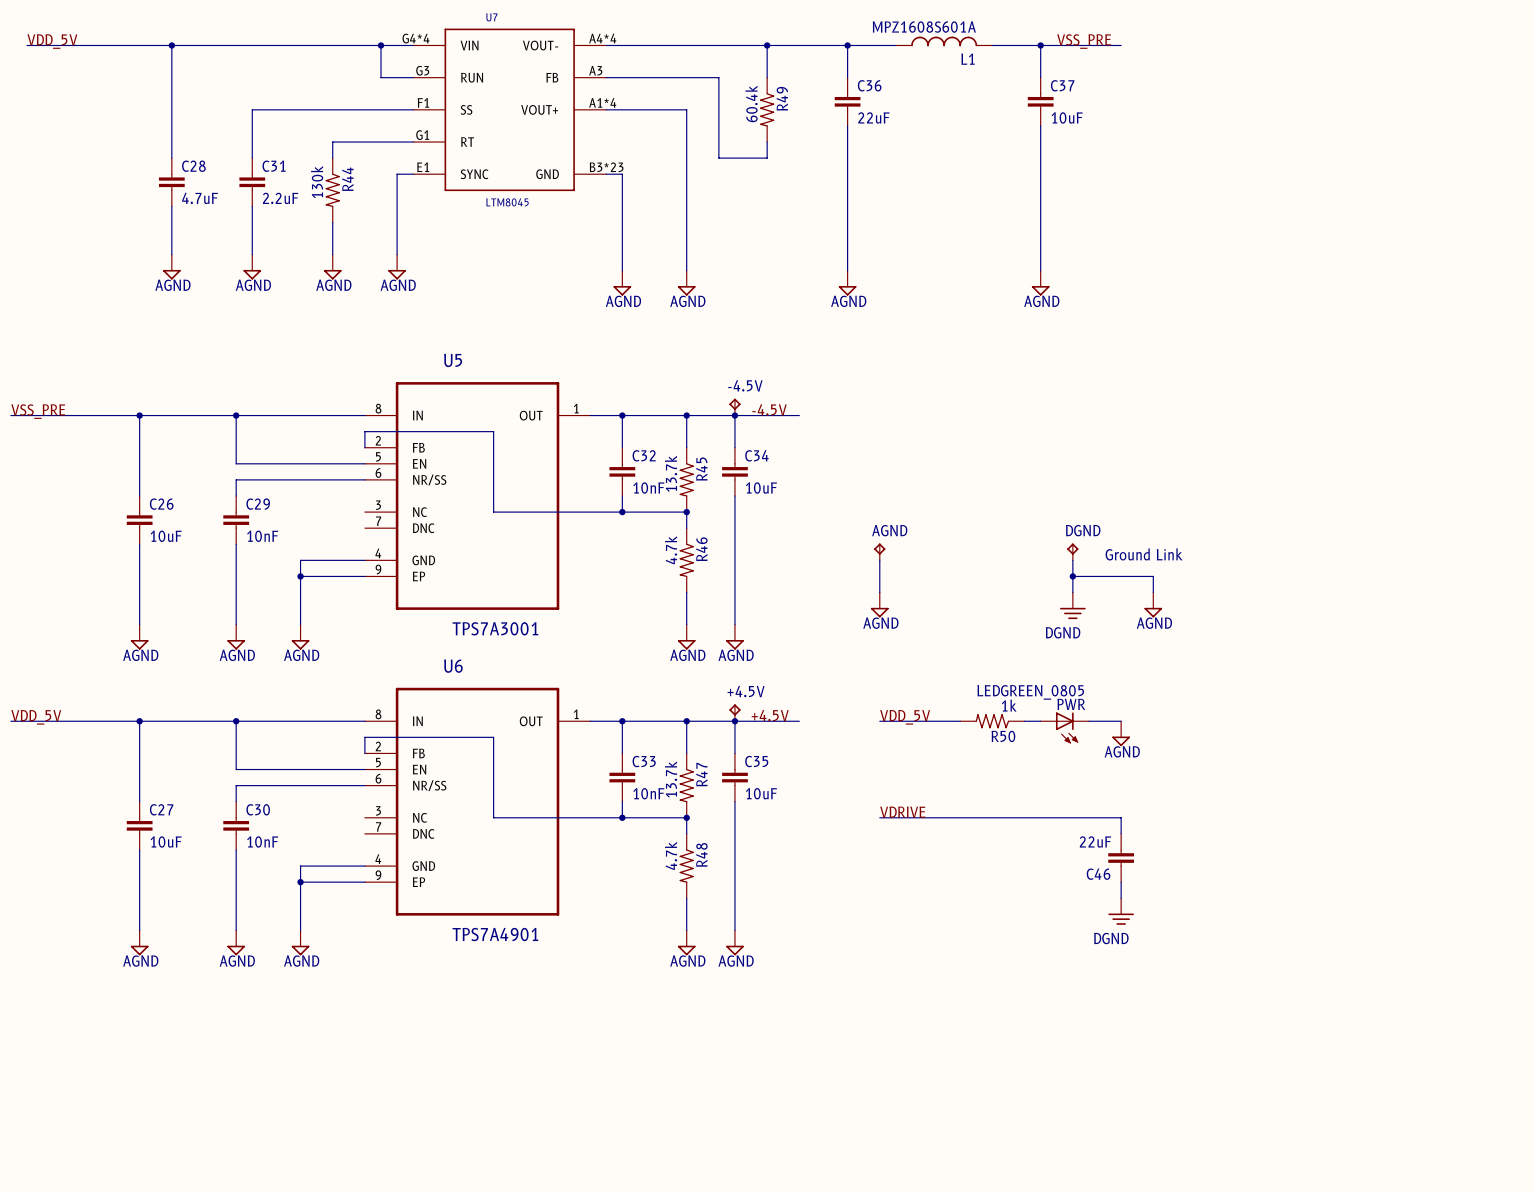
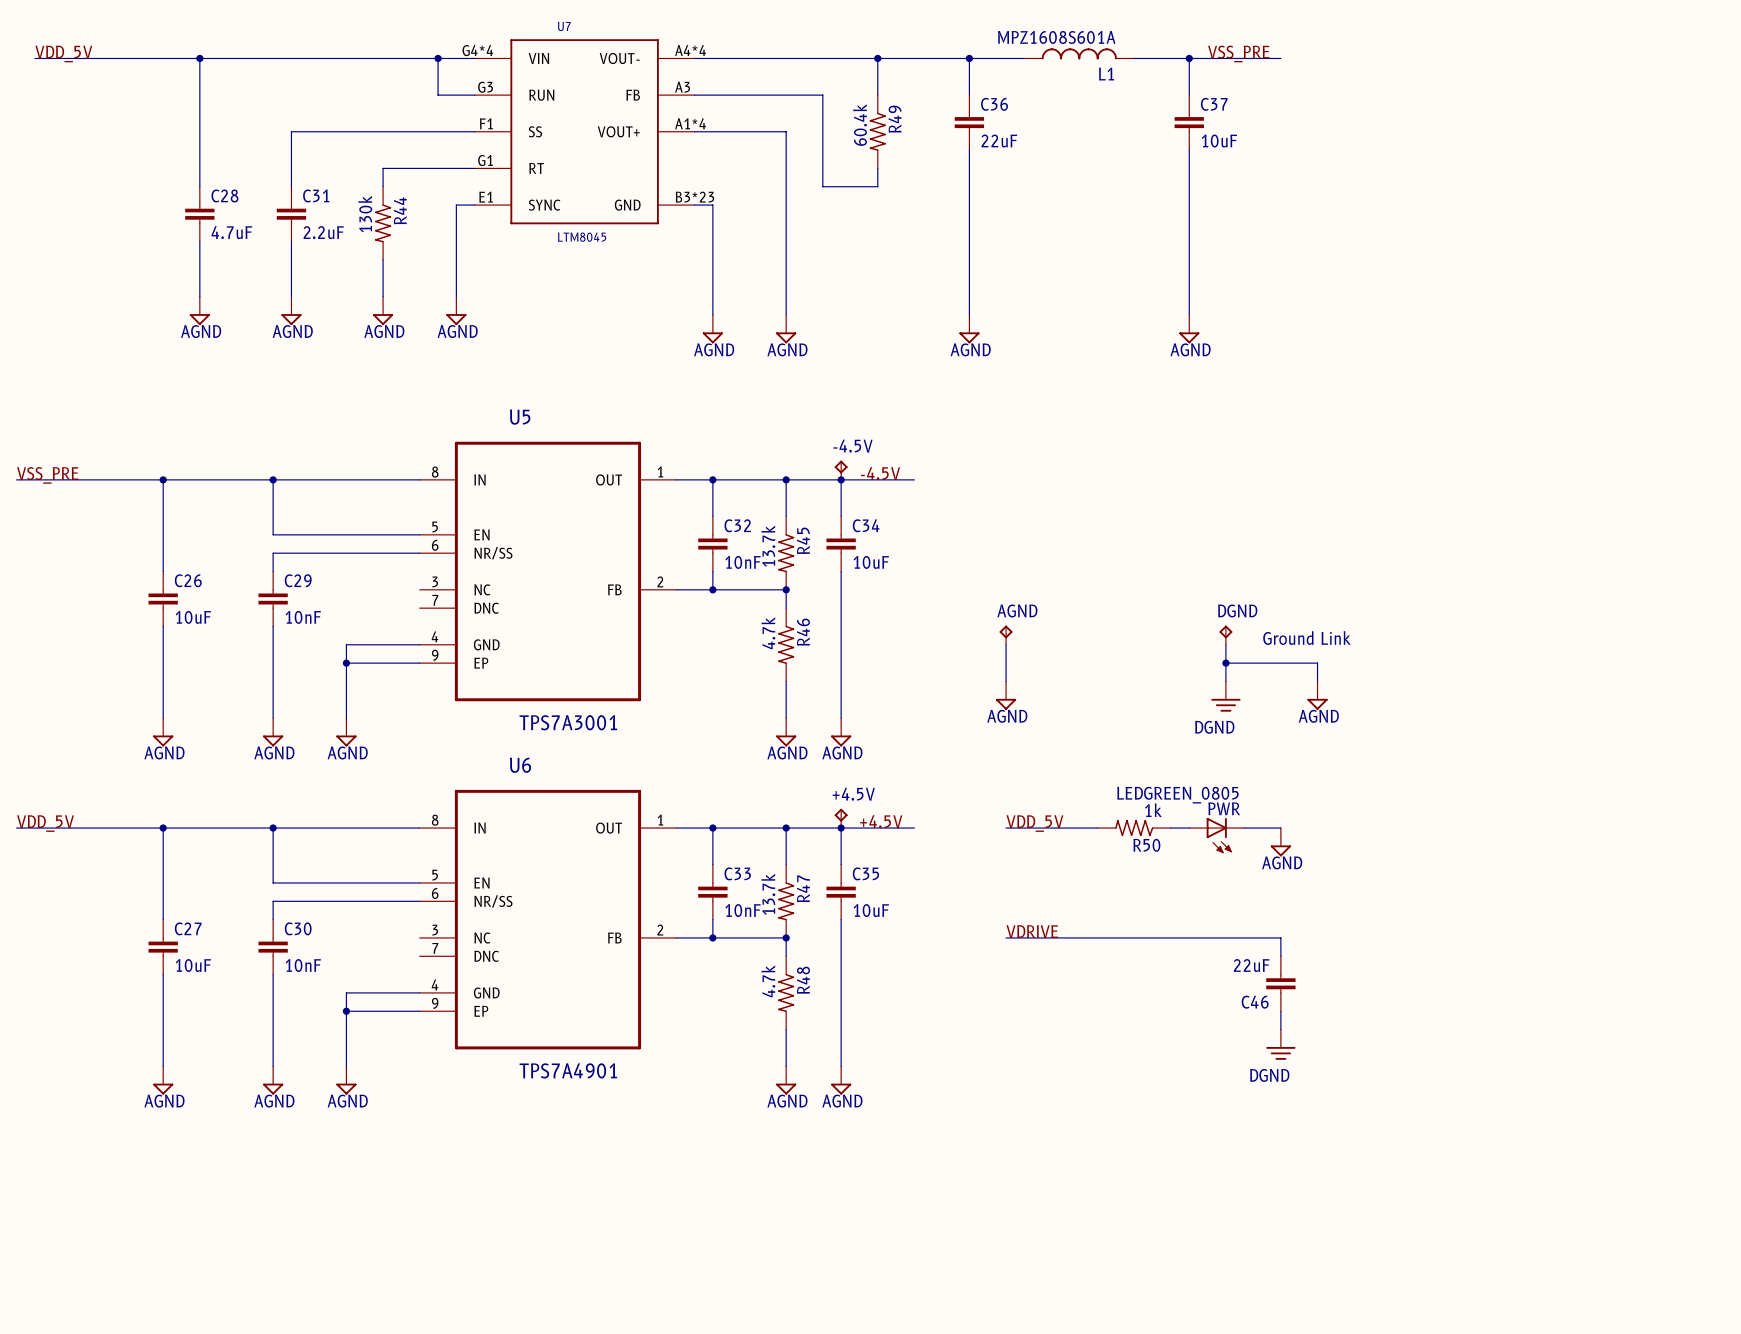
U5 symbol: [364, 382, 591, 610] -> [419, 441, 677, 702]
wire: (364, 447) (364, 431) (493, 431) (493, 512) (590, 512) -> none
U6 symbol: [364, 687, 591, 916] -> [419, 789, 677, 1050]
wire: (364, 753) (364, 737) (493, 737) (493, 817) (590, 817) -> none

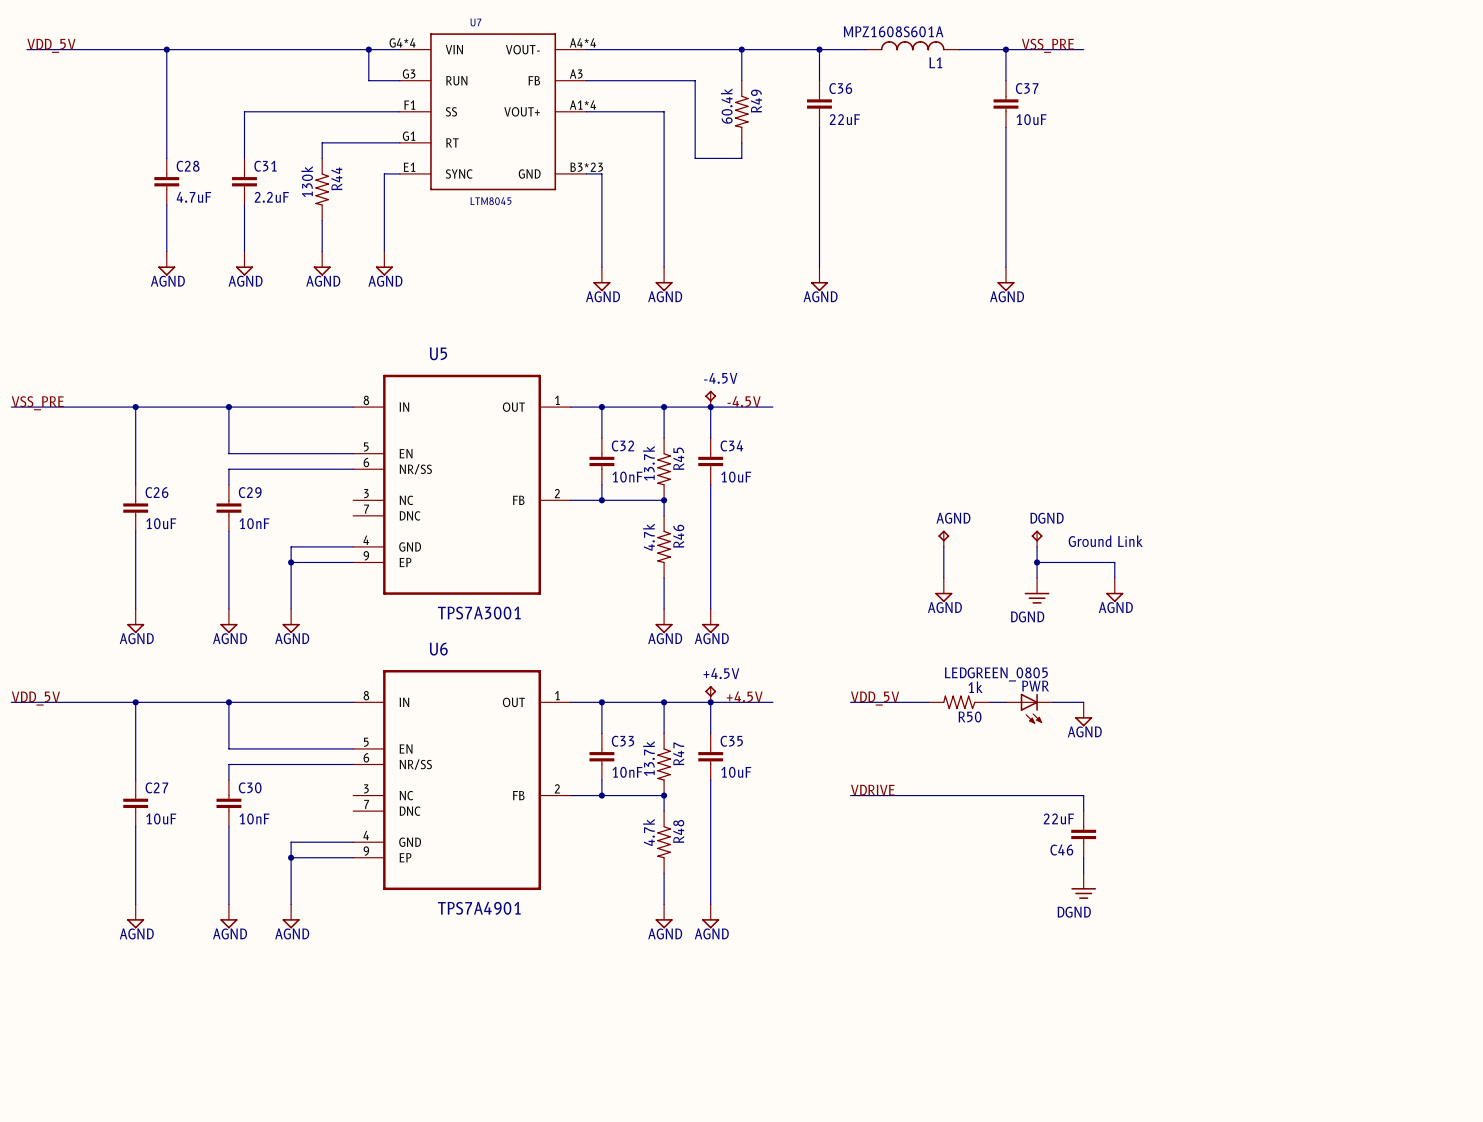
AGND position: (1006, 635) -> (943, 538)
wire: (1006, 644) (1006, 681) -> (943, 546) (943, 578)
power symbol position: AGND (1006, 695) -> AGND (943, 590)

